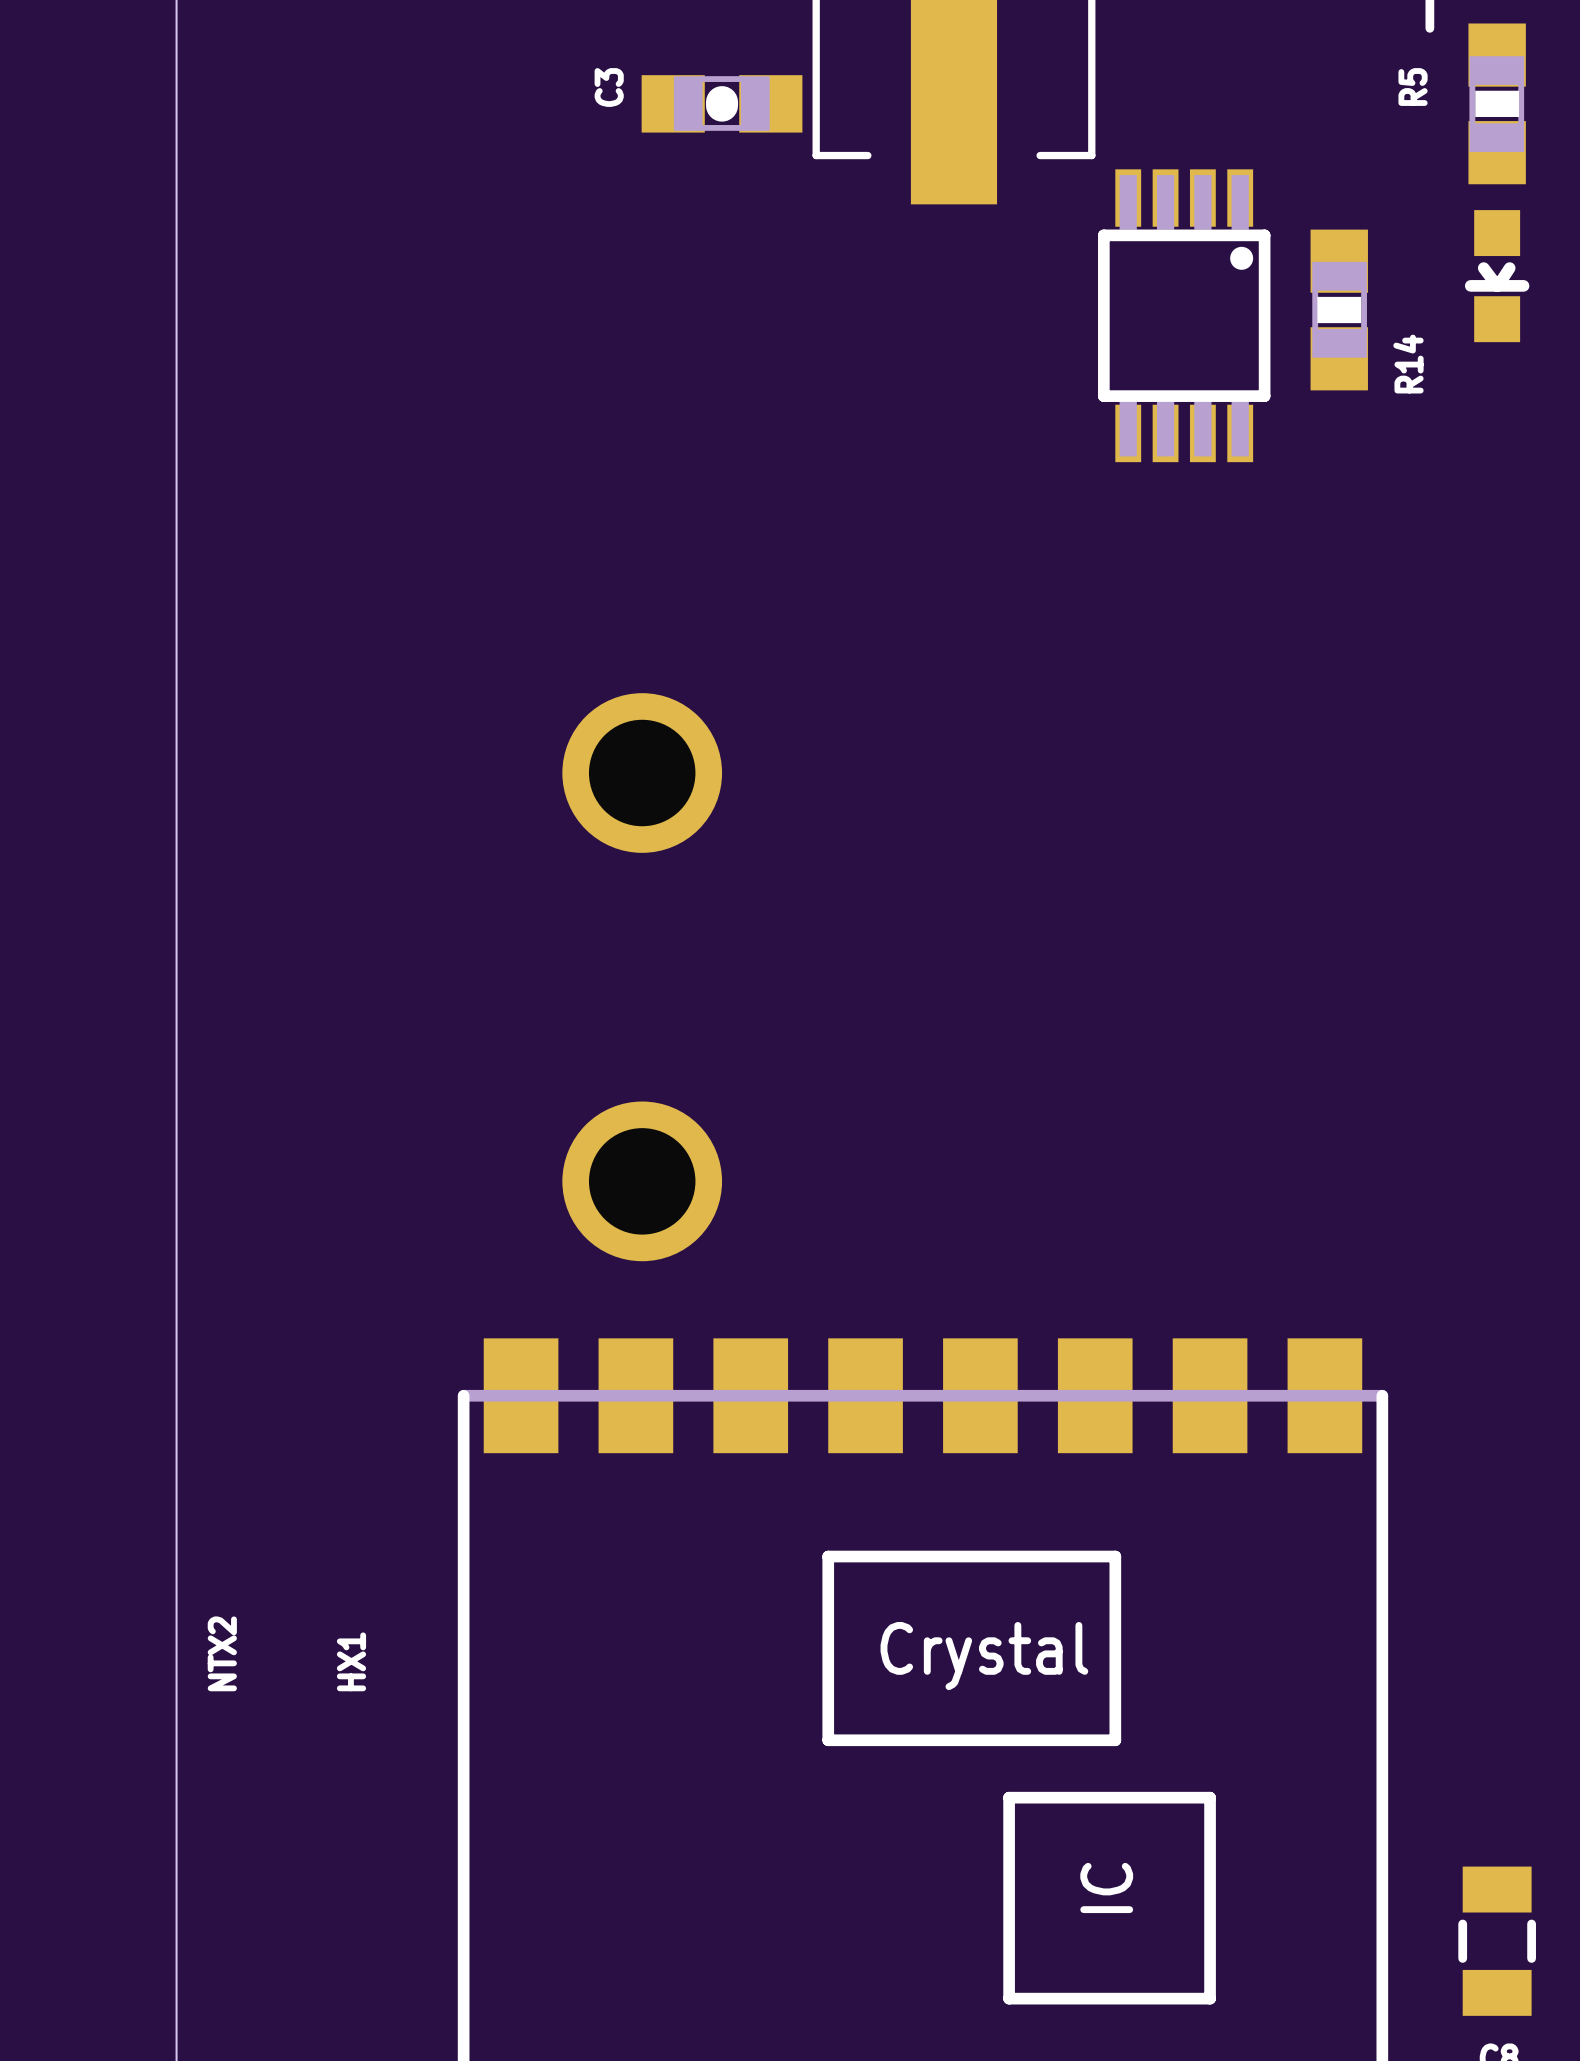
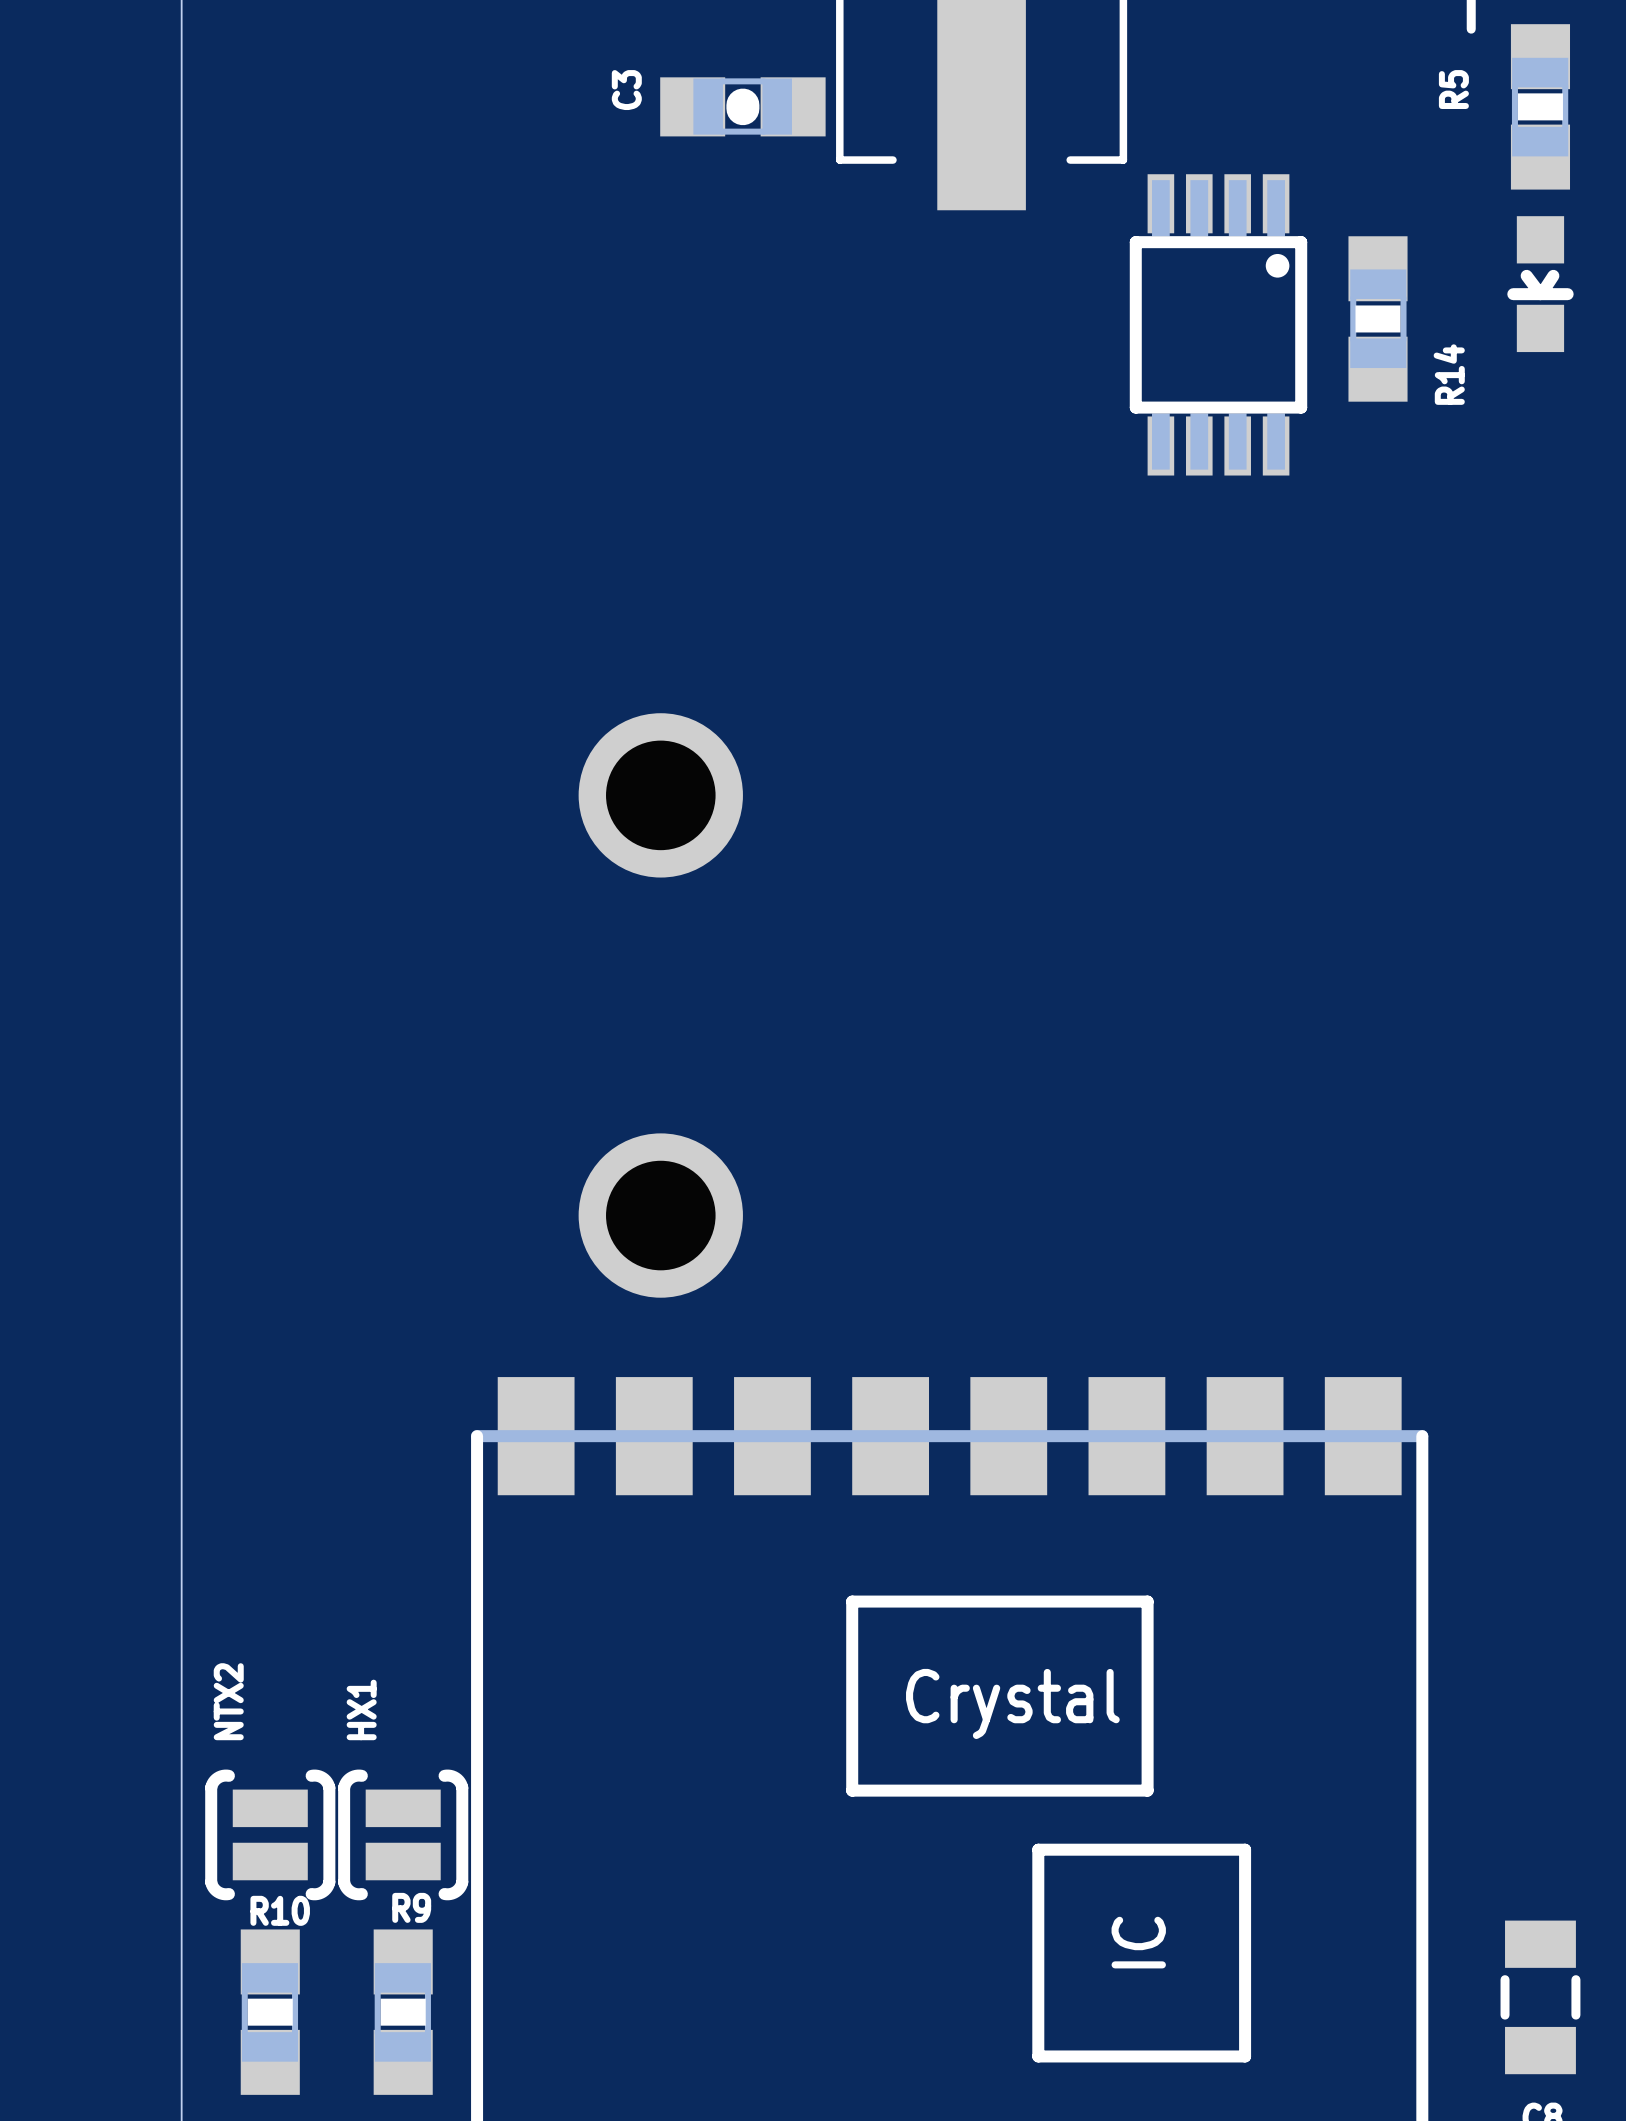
part: none -> (270, 1834)
part: none -> (403, 1834)
R10: none -> (270, 2012)
R9: none -> (403, 2012)

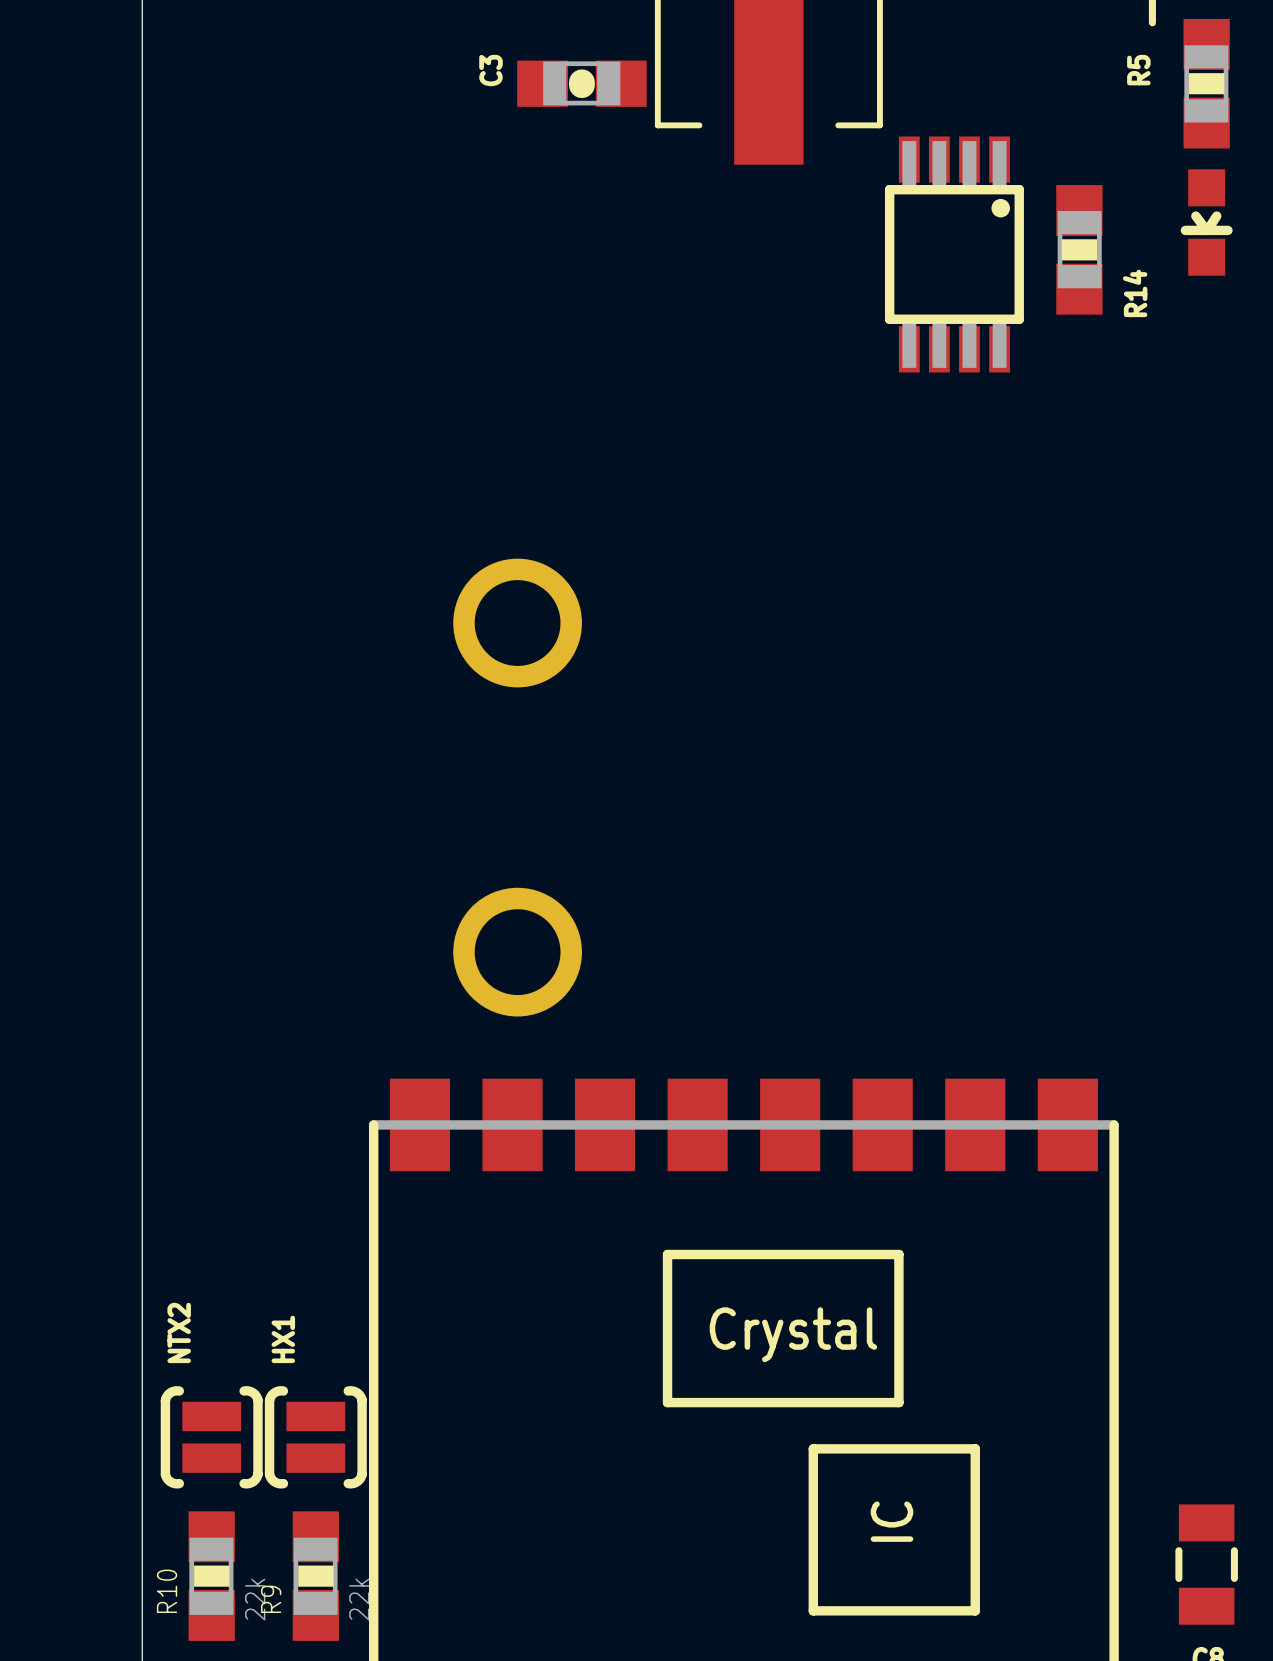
R9 name rotation: 0° (411, 1907) -> 90° counterclockwise (271, 1599)
R9 name position: R9 (411, 1907) -> R9 (271, 1599)
R10 name rotation: 0° (280, 1910) -> 90° counterclockwise (167, 1591)
R10 name position: R10 (280, 1910) -> R10 (167, 1591)
R10 value: none -> 22k (255, 1599)
R9 value: none -> 22k (359, 1599)

